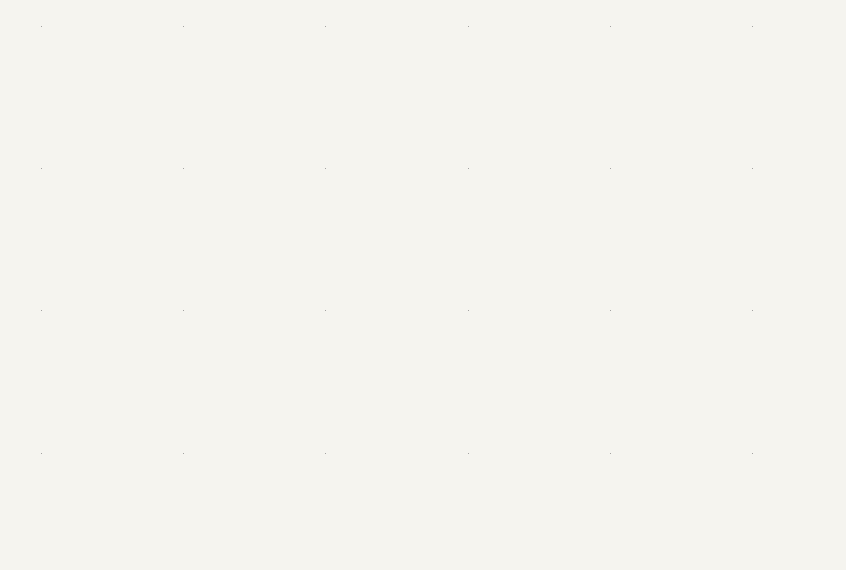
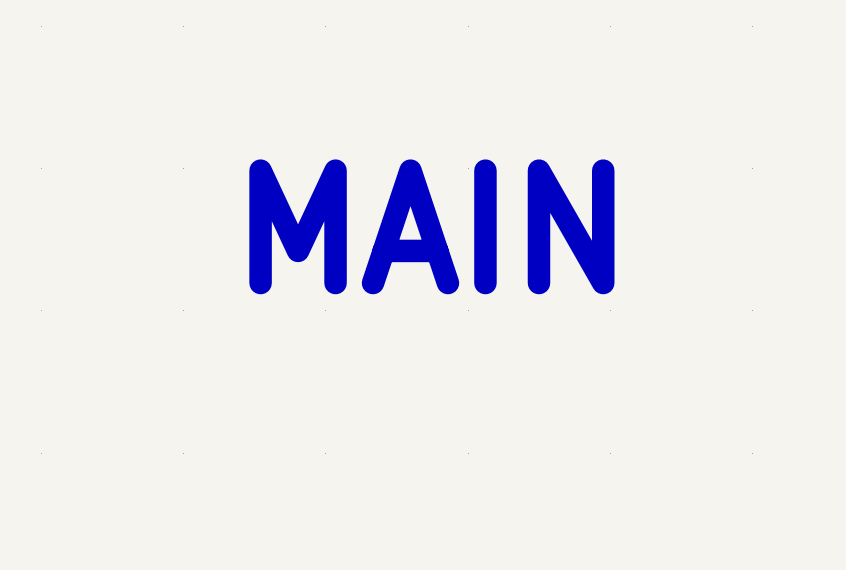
text: none -> MAIN (431, 226)

